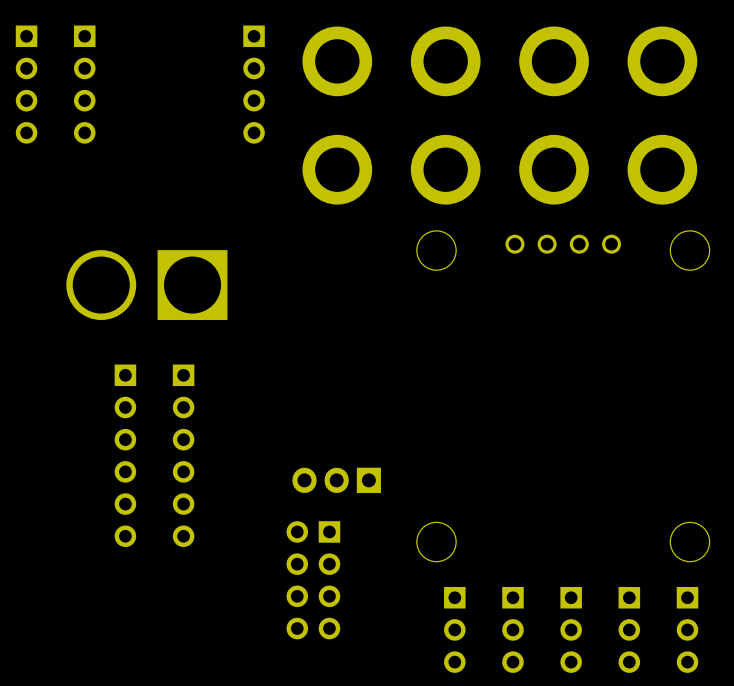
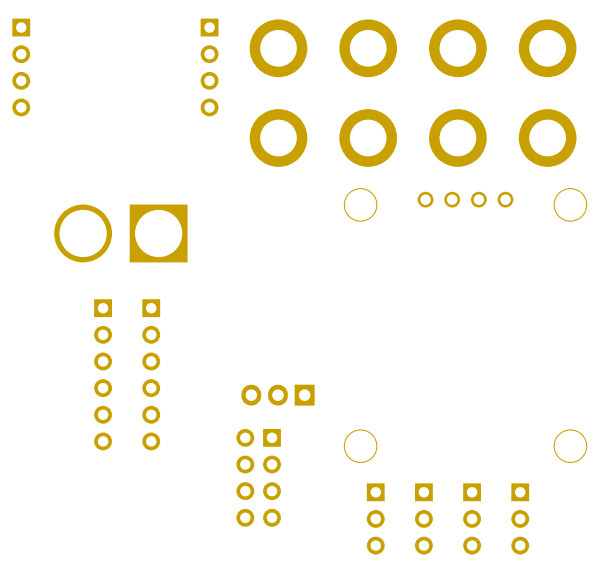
part: (84, 84) -> none
part: (687, 629) -> none

